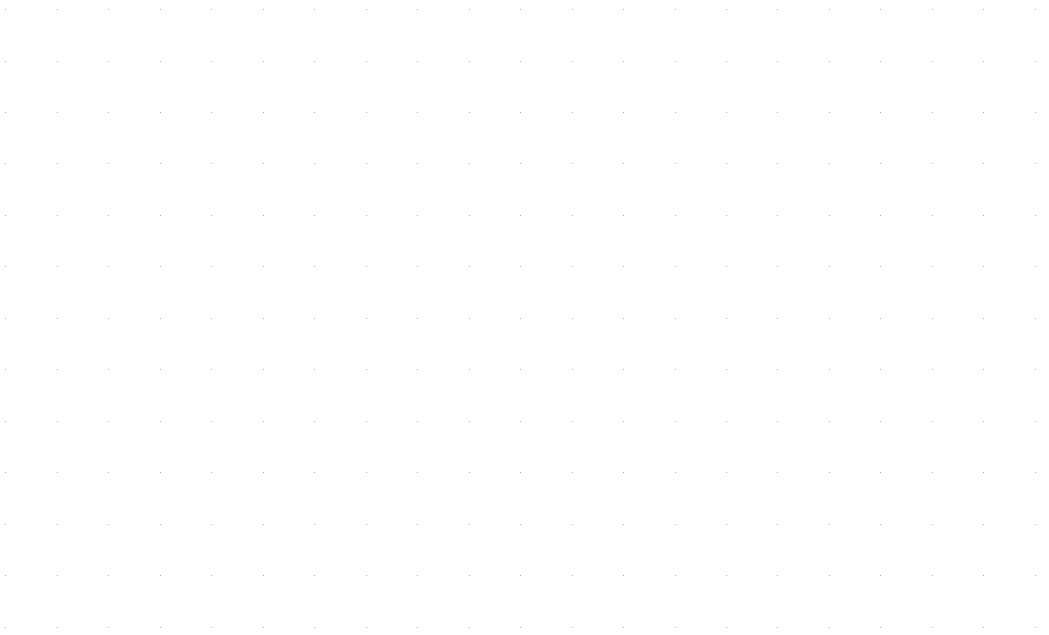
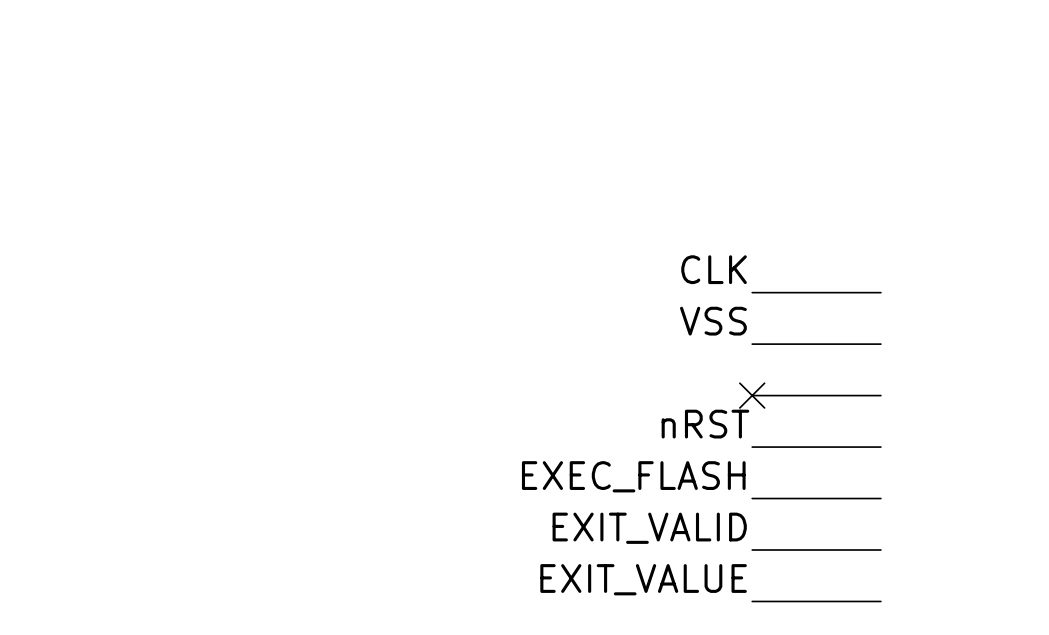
label: none -> CLK (714, 269)
wire: none -> (752, 292) (880, 292)
label: none -> VSS (713, 321)
wire: none -> (752, 344) (880, 344)
wire: none -> (752, 395) (880, 395)
no-connect mark: none -> (752, 395)
label: none -> nRST (705, 424)
wire: none -> (752, 447) (880, 447)
label: none -> EXEC_FLASH (633, 476)
wire: none -> (752, 498) (880, 498)
label: none -> EXIT_VALID (649, 528)
wire: none -> (752, 550) (880, 550)
label: none -> EXIT_VALUE (643, 579)
wire: none -> (752, 601) (880, 601)

